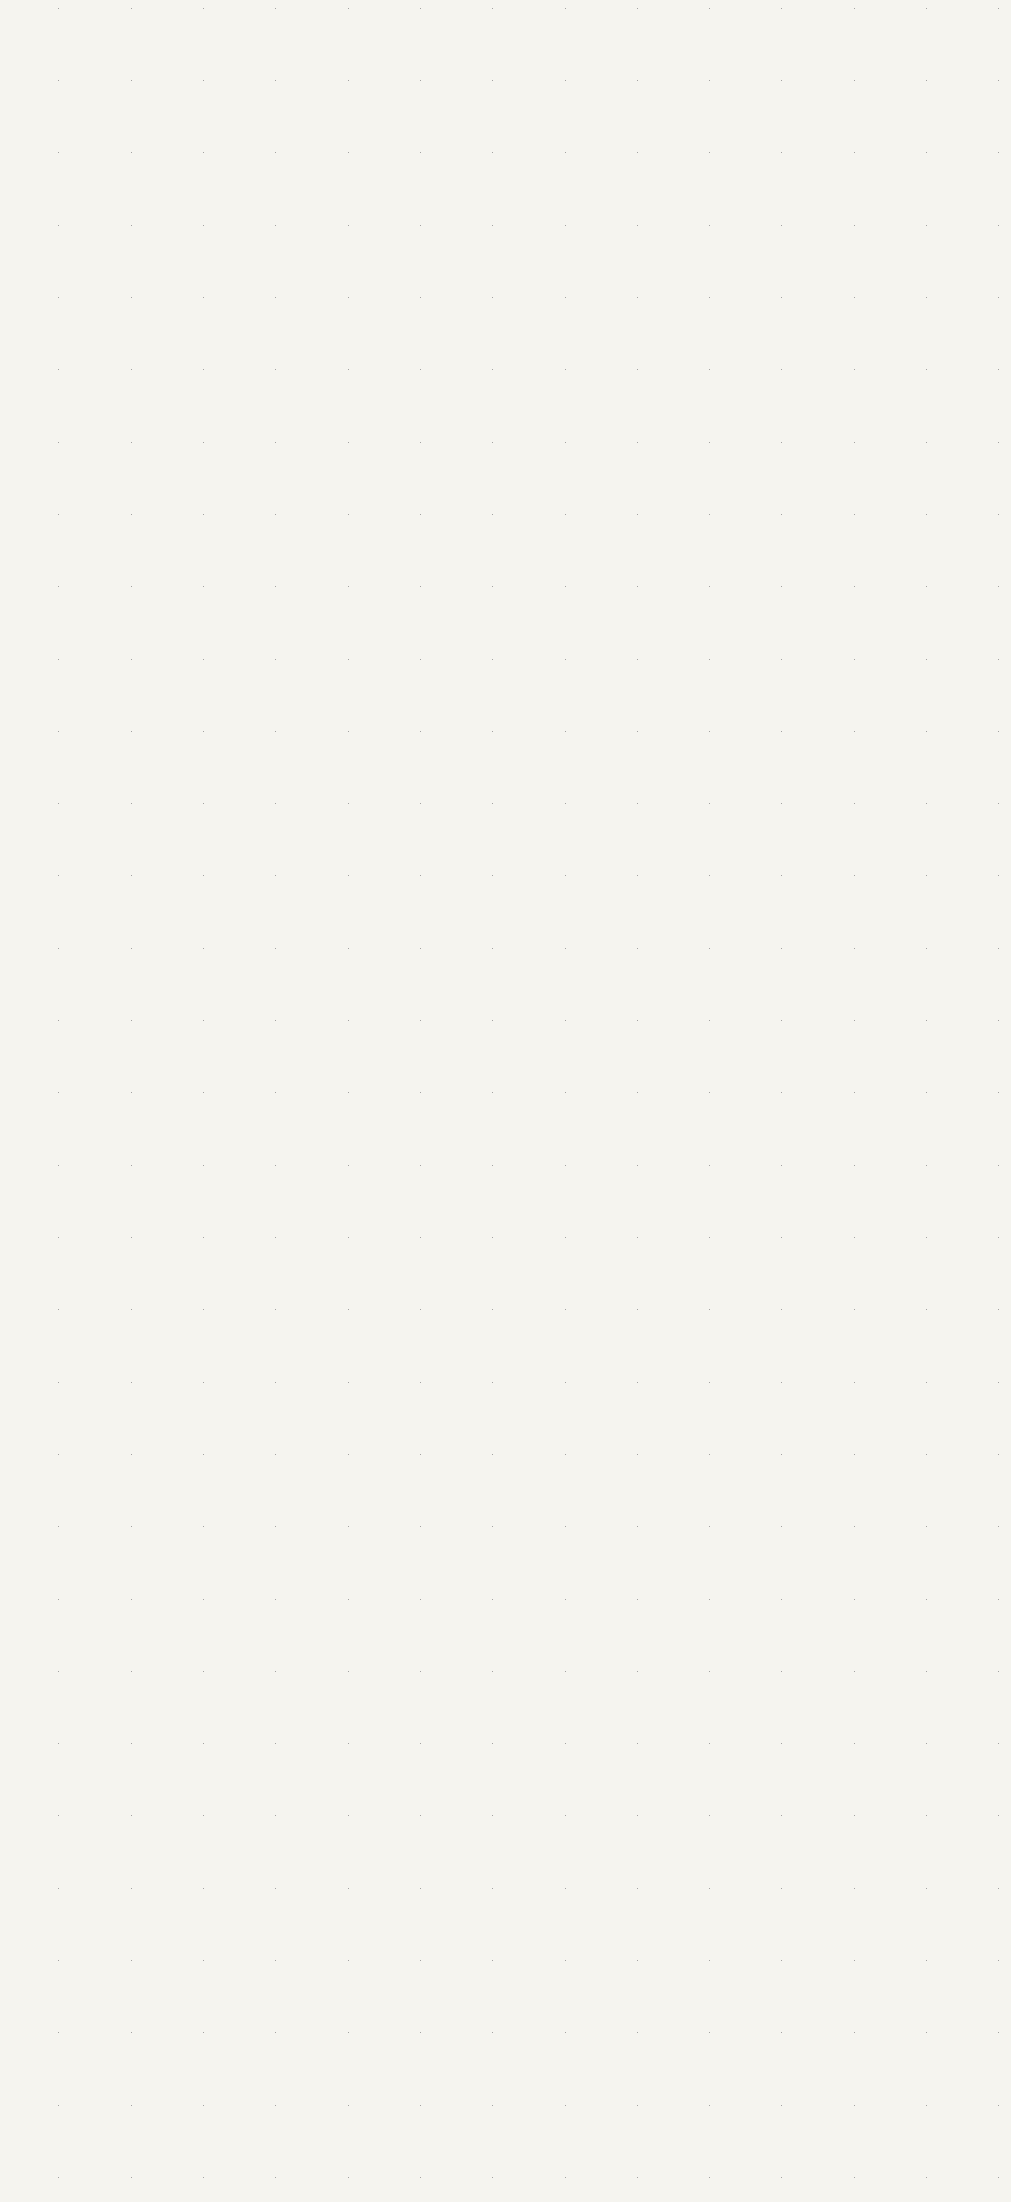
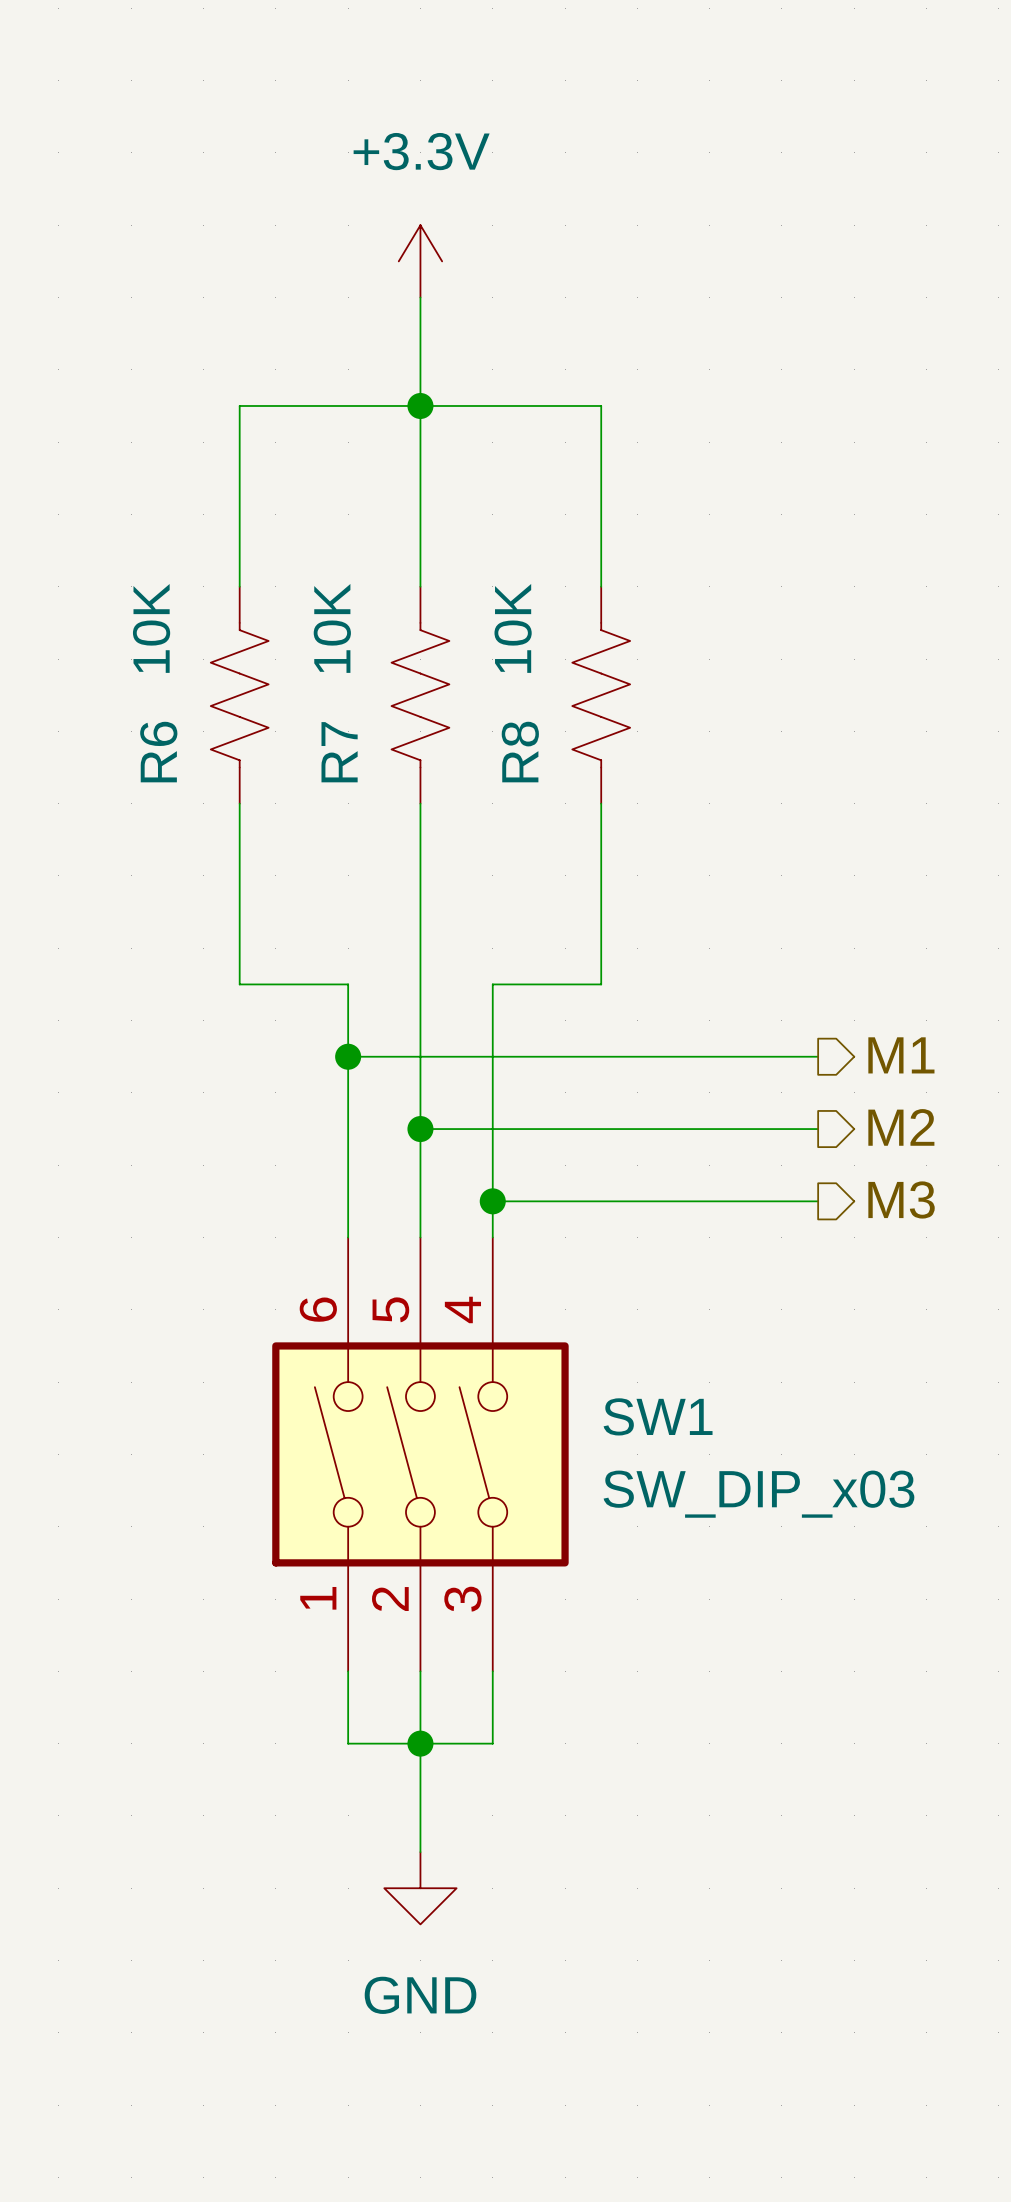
power symbol: none -> +3.3V (420, 261)
wire: none -> (420, 297) (420, 586)
junction: none -> (420, 405)
wire: none -> (239, 586) (239, 405) (601, 405) (601, 586)
R6: none -> 10K (239, 695)
R7: none -> 10K (420, 695)
R8: none -> 10K (601, 695)
wire: none -> (239, 803) (239, 984) (348, 984) (348, 1237)
wire: none -> (420, 803) (420, 1237)
wire: none -> (601, 803) (601, 984) (492, 984) (492, 1237)
hierarchical label: none -> M1 (901, 1055)
wire: none -> (348, 1056) (818, 1056)
junction: none -> (348, 1056)
hierarchical label: none -> M2 (901, 1127)
wire: none -> (420, 1129) (818, 1129)
junction: none -> (420, 1129)
hierarchical label: none -> M3 (901, 1199)
wire: none -> (492, 1201) (818, 1201)
junction: none -> (492, 1201)
SW1: none -> SW_DIP_x03 (420, 1454)
wire: none -> (348, 1671) (348, 1743) (492, 1743) (492, 1671)
wire: none -> (420, 1671) (420, 1852)
junction: none -> (420, 1743)
power symbol: none -> GND (420, 1888)

